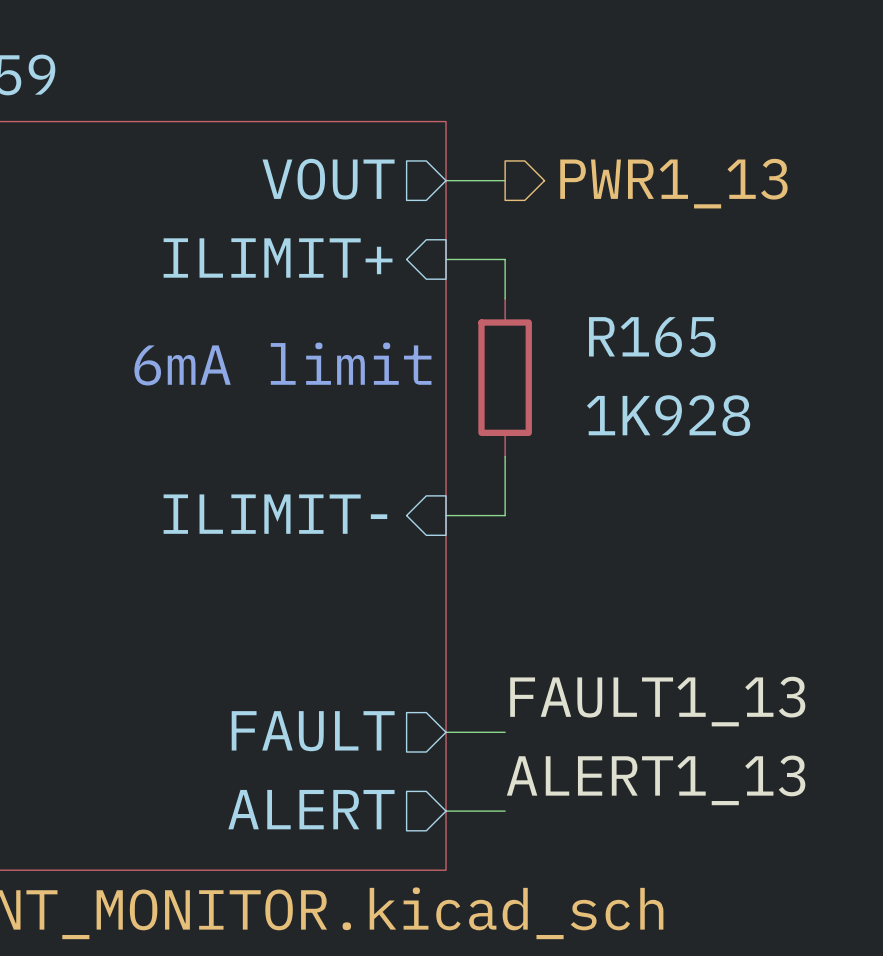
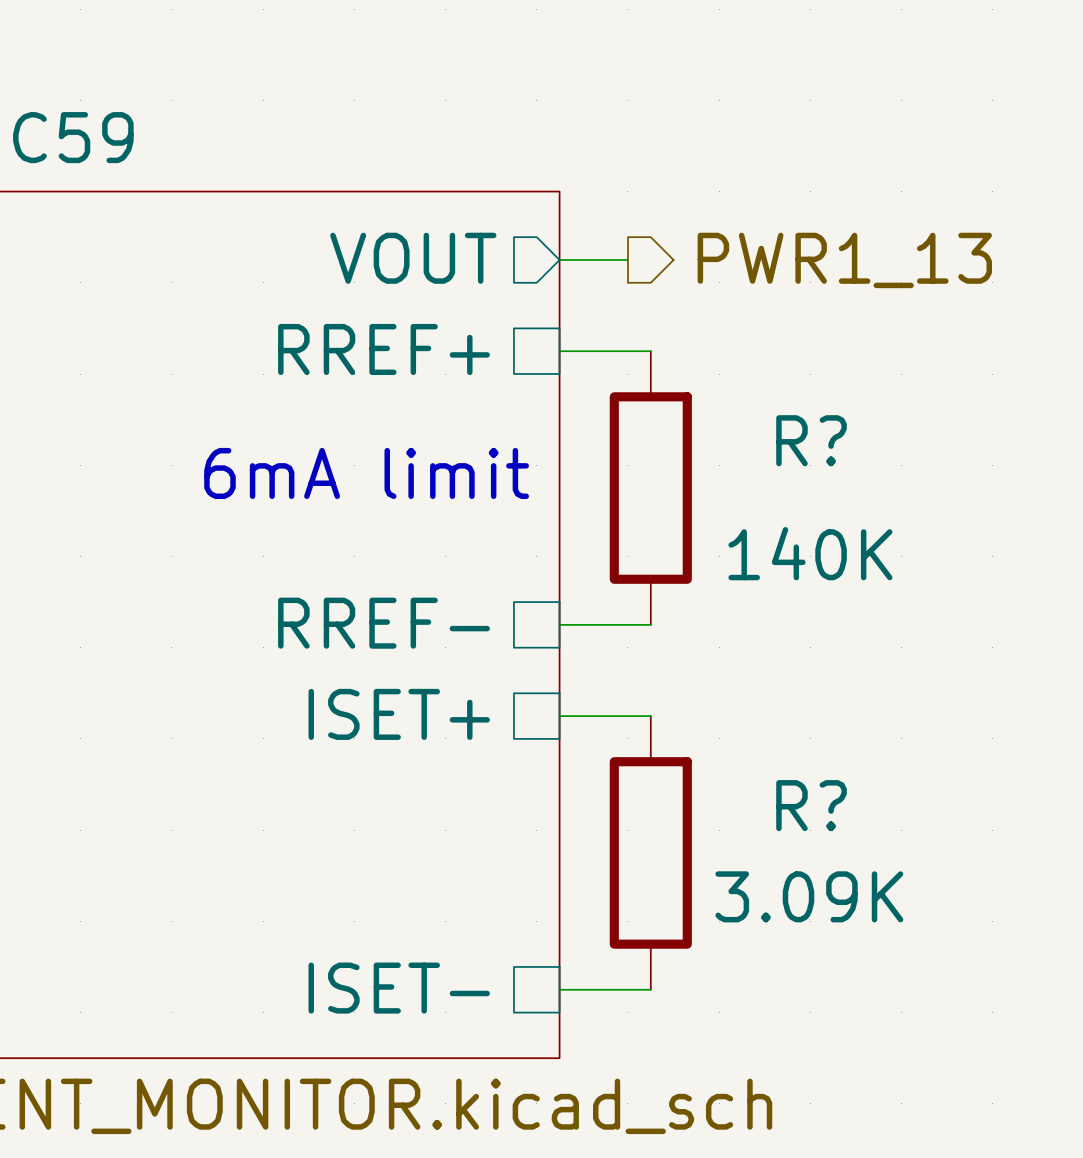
sheet pin shape: input (278, 258) -> passive (384, 349)
sheet pin: ILIMIT+ (278, 258) -> RREF+ (384, 349)
wire: (505, 259) (505, 298) -> (627, 351) (650, 351)
R165: 1K928 (505, 377) -> none
R?: none -> 140K (650, 488)
wire: (505, 456) (505, 515) (446, 515) -> none
wire: none -> (559, 624) (650, 624)
sheet pin shape: input (275, 514) -> passive (384, 623)
sheet pin: ILIMIT- (275, 514) -> RREF- (384, 623)
sheet pin: none -> ISET+ (399, 714)
wire: none -> (559, 716) (650, 716)
R?: none -> 3.09K (650, 852)
label: FAULT1_13 (657, 701) -> none
sheet pin: FAULT (313, 731) -> none
wire: (446, 732) (505, 732) -> none
label: ALERT1_13 (656, 780) -> none
sheet pin shape: output (311, 809) -> passive (399, 988)
sheet pin: ALERT (311, 809) -> ISET- (399, 988)
wire: none -> (627, 989) (650, 989)

